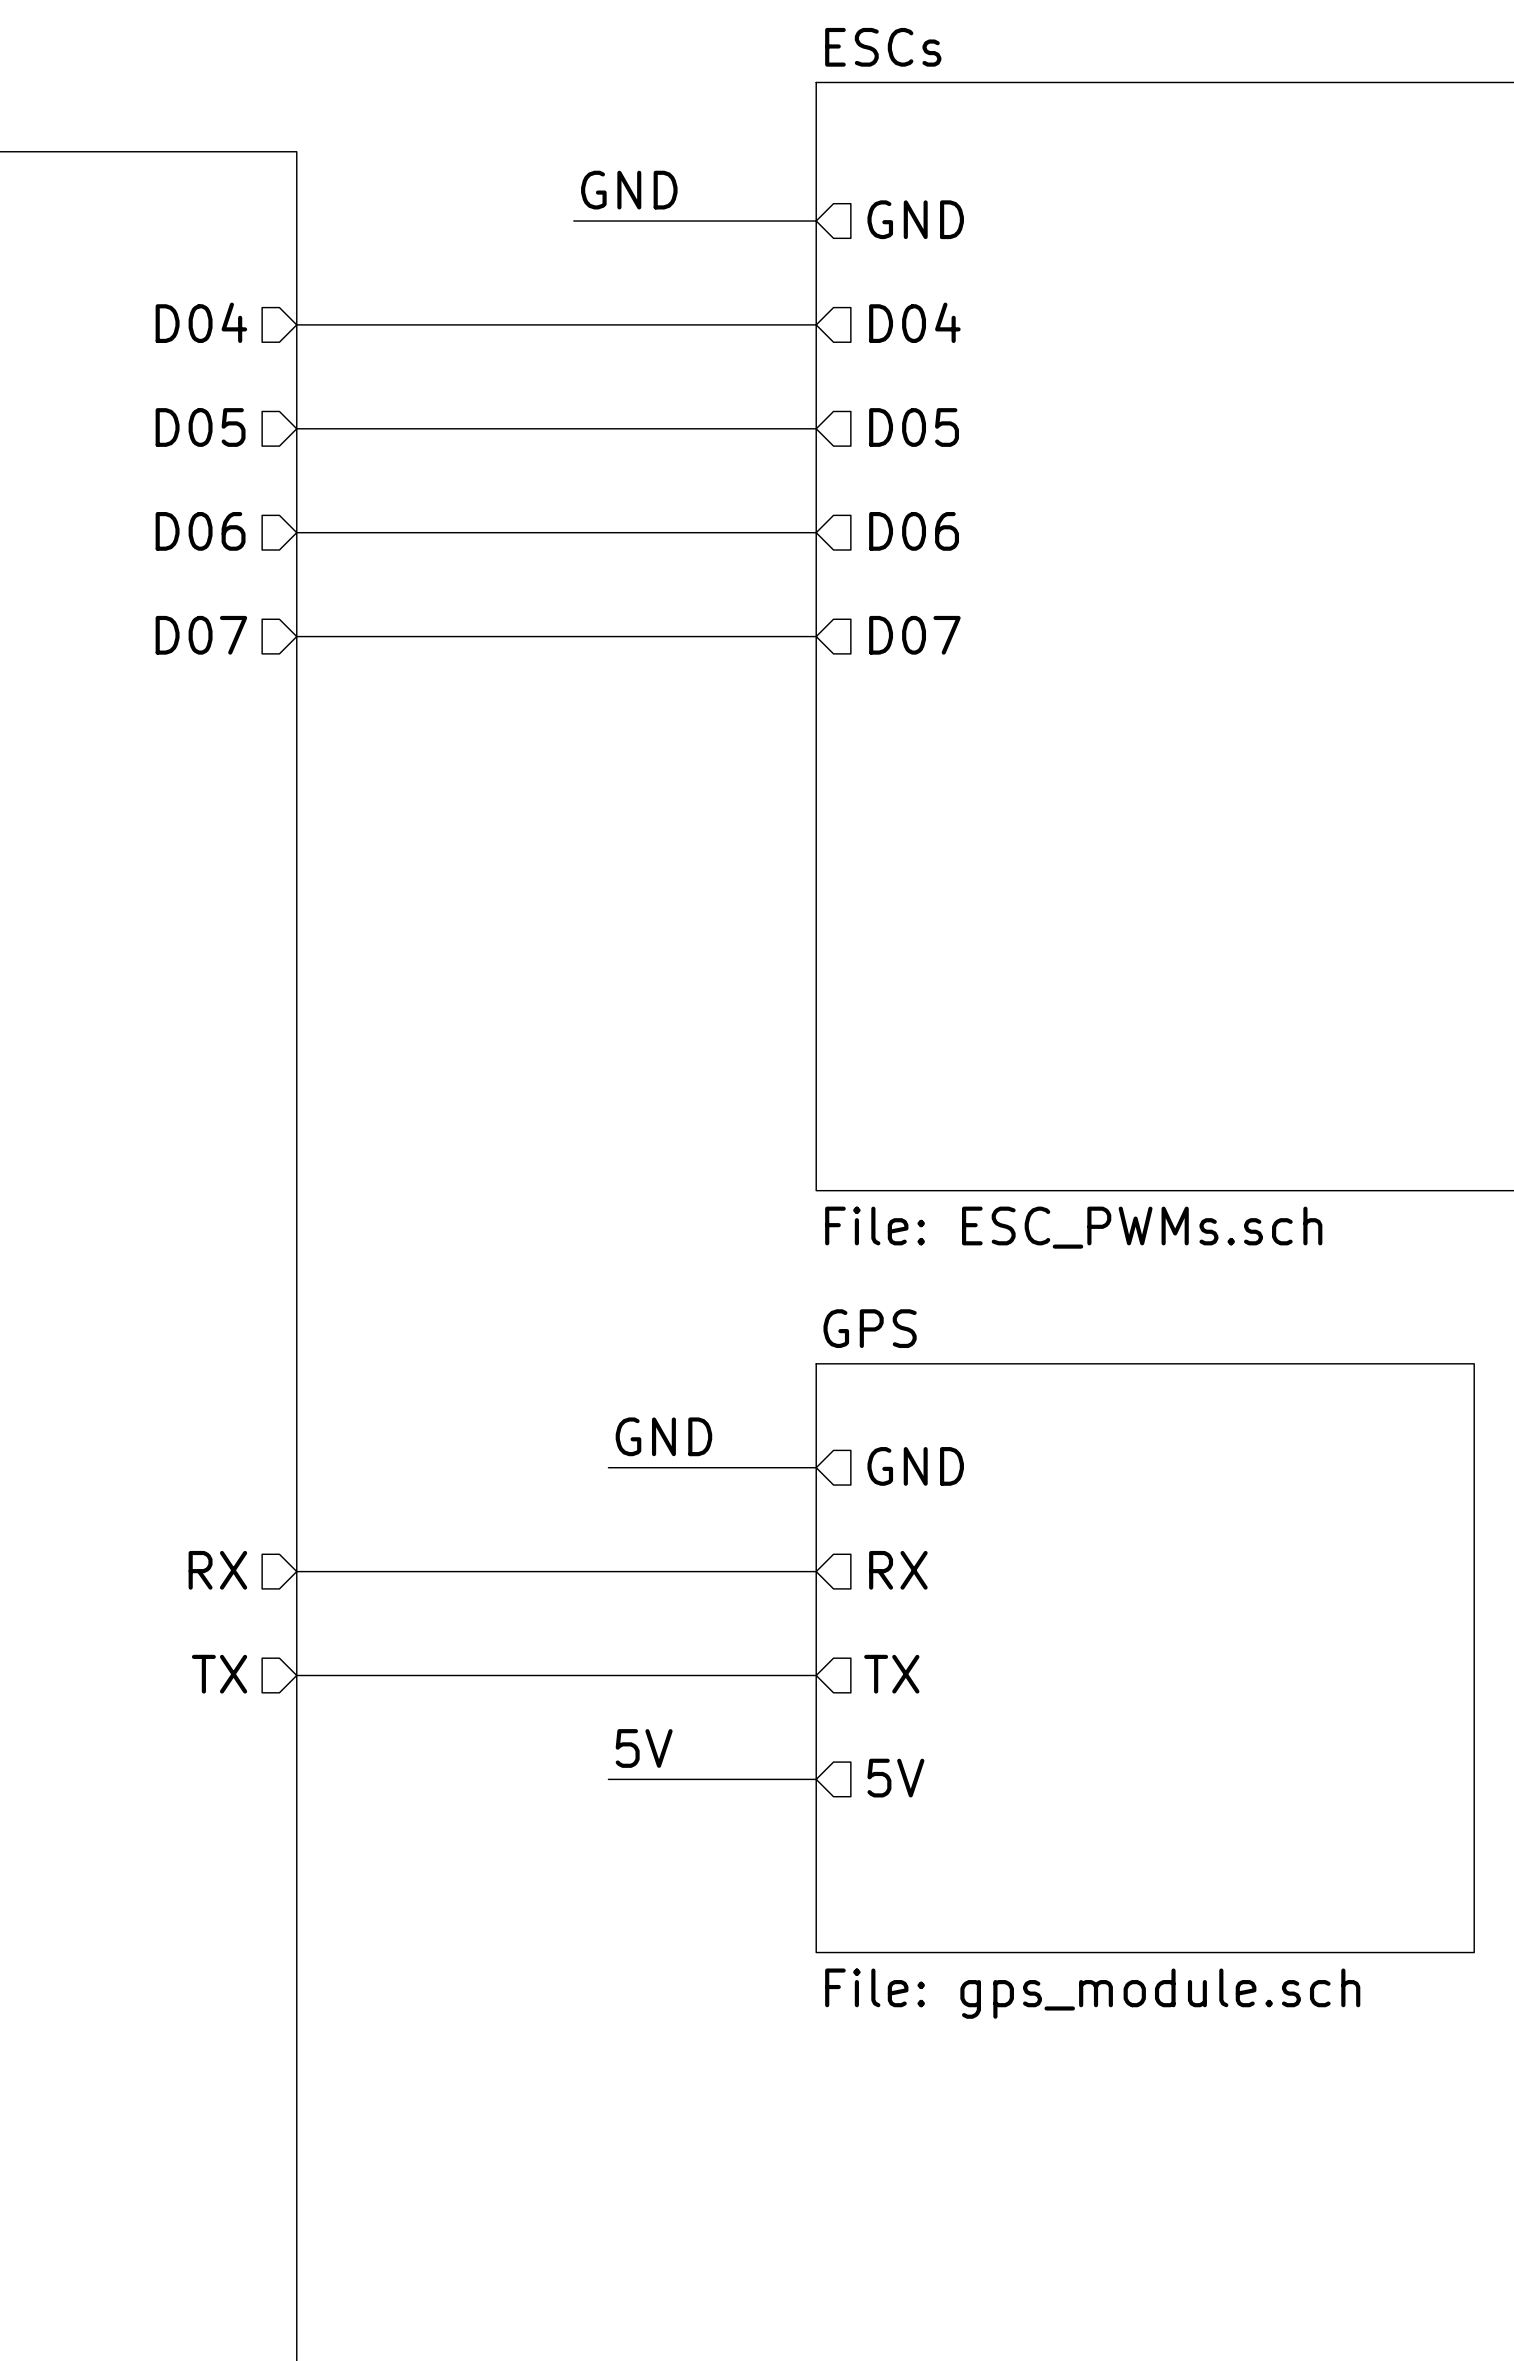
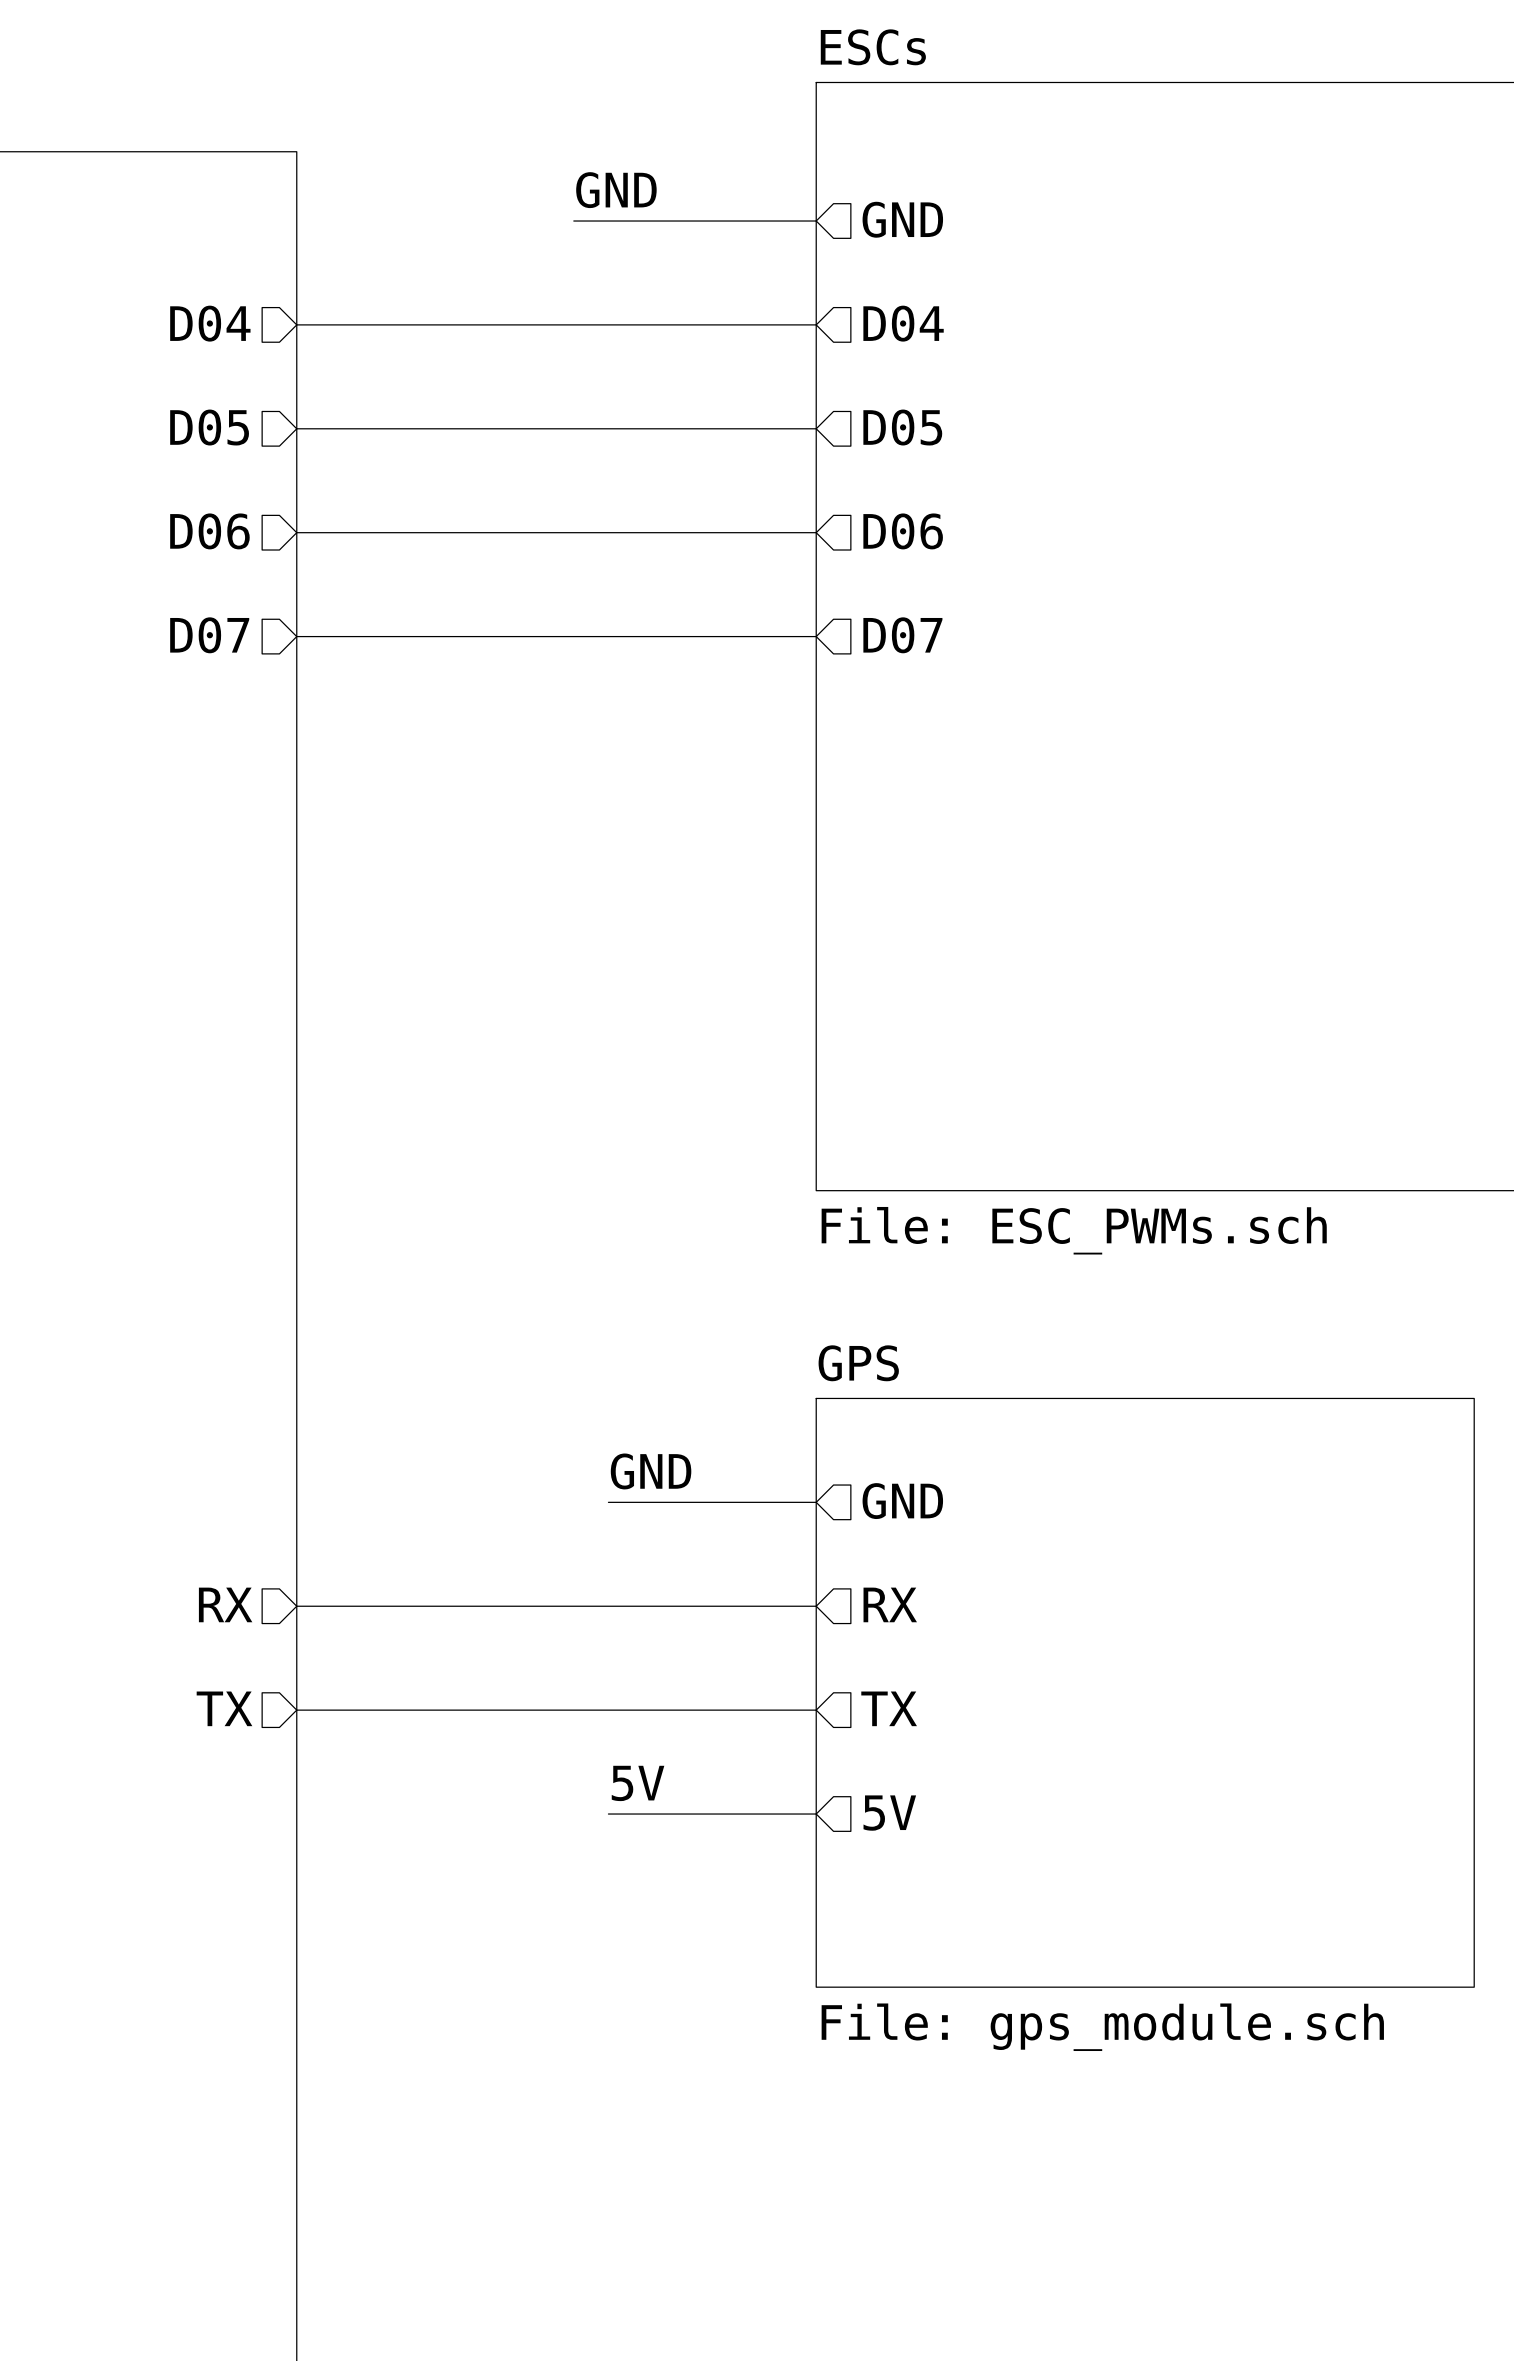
label position: GND (663, 1436) -> GND (651, 1471)
hierarchical label position: GND (915, 1466) -> GND (902, 1501)
wire: (608, 1467) (816, 1467) -> (608, 1502) (816, 1502)
hierarchical label position: RX (217, 1570) -> RX (225, 1604)
hierarchical label position: RX (898, 1570) -> RX (890, 1604)
wire: (296, 1571) (816, 1571) -> (296, 1606) (816, 1606)
sheet GPS position: (1145, 1658) -> (1145, 1692)
hierarchical label position: TX (219, 1674) -> TX (224, 1708)
hierarchical label position: TX (891, 1674) -> TX (889, 1708)
wire: (296, 1675) (816, 1675) -> (296, 1710) (816, 1710)
label position: 5V (644, 1748) -> 5V (638, 1783)
hierarchical label position: 5V (895, 1778) -> 5V (889, 1813)
wire: (608, 1779) (816, 1779) -> (608, 1814) (816, 1814)

